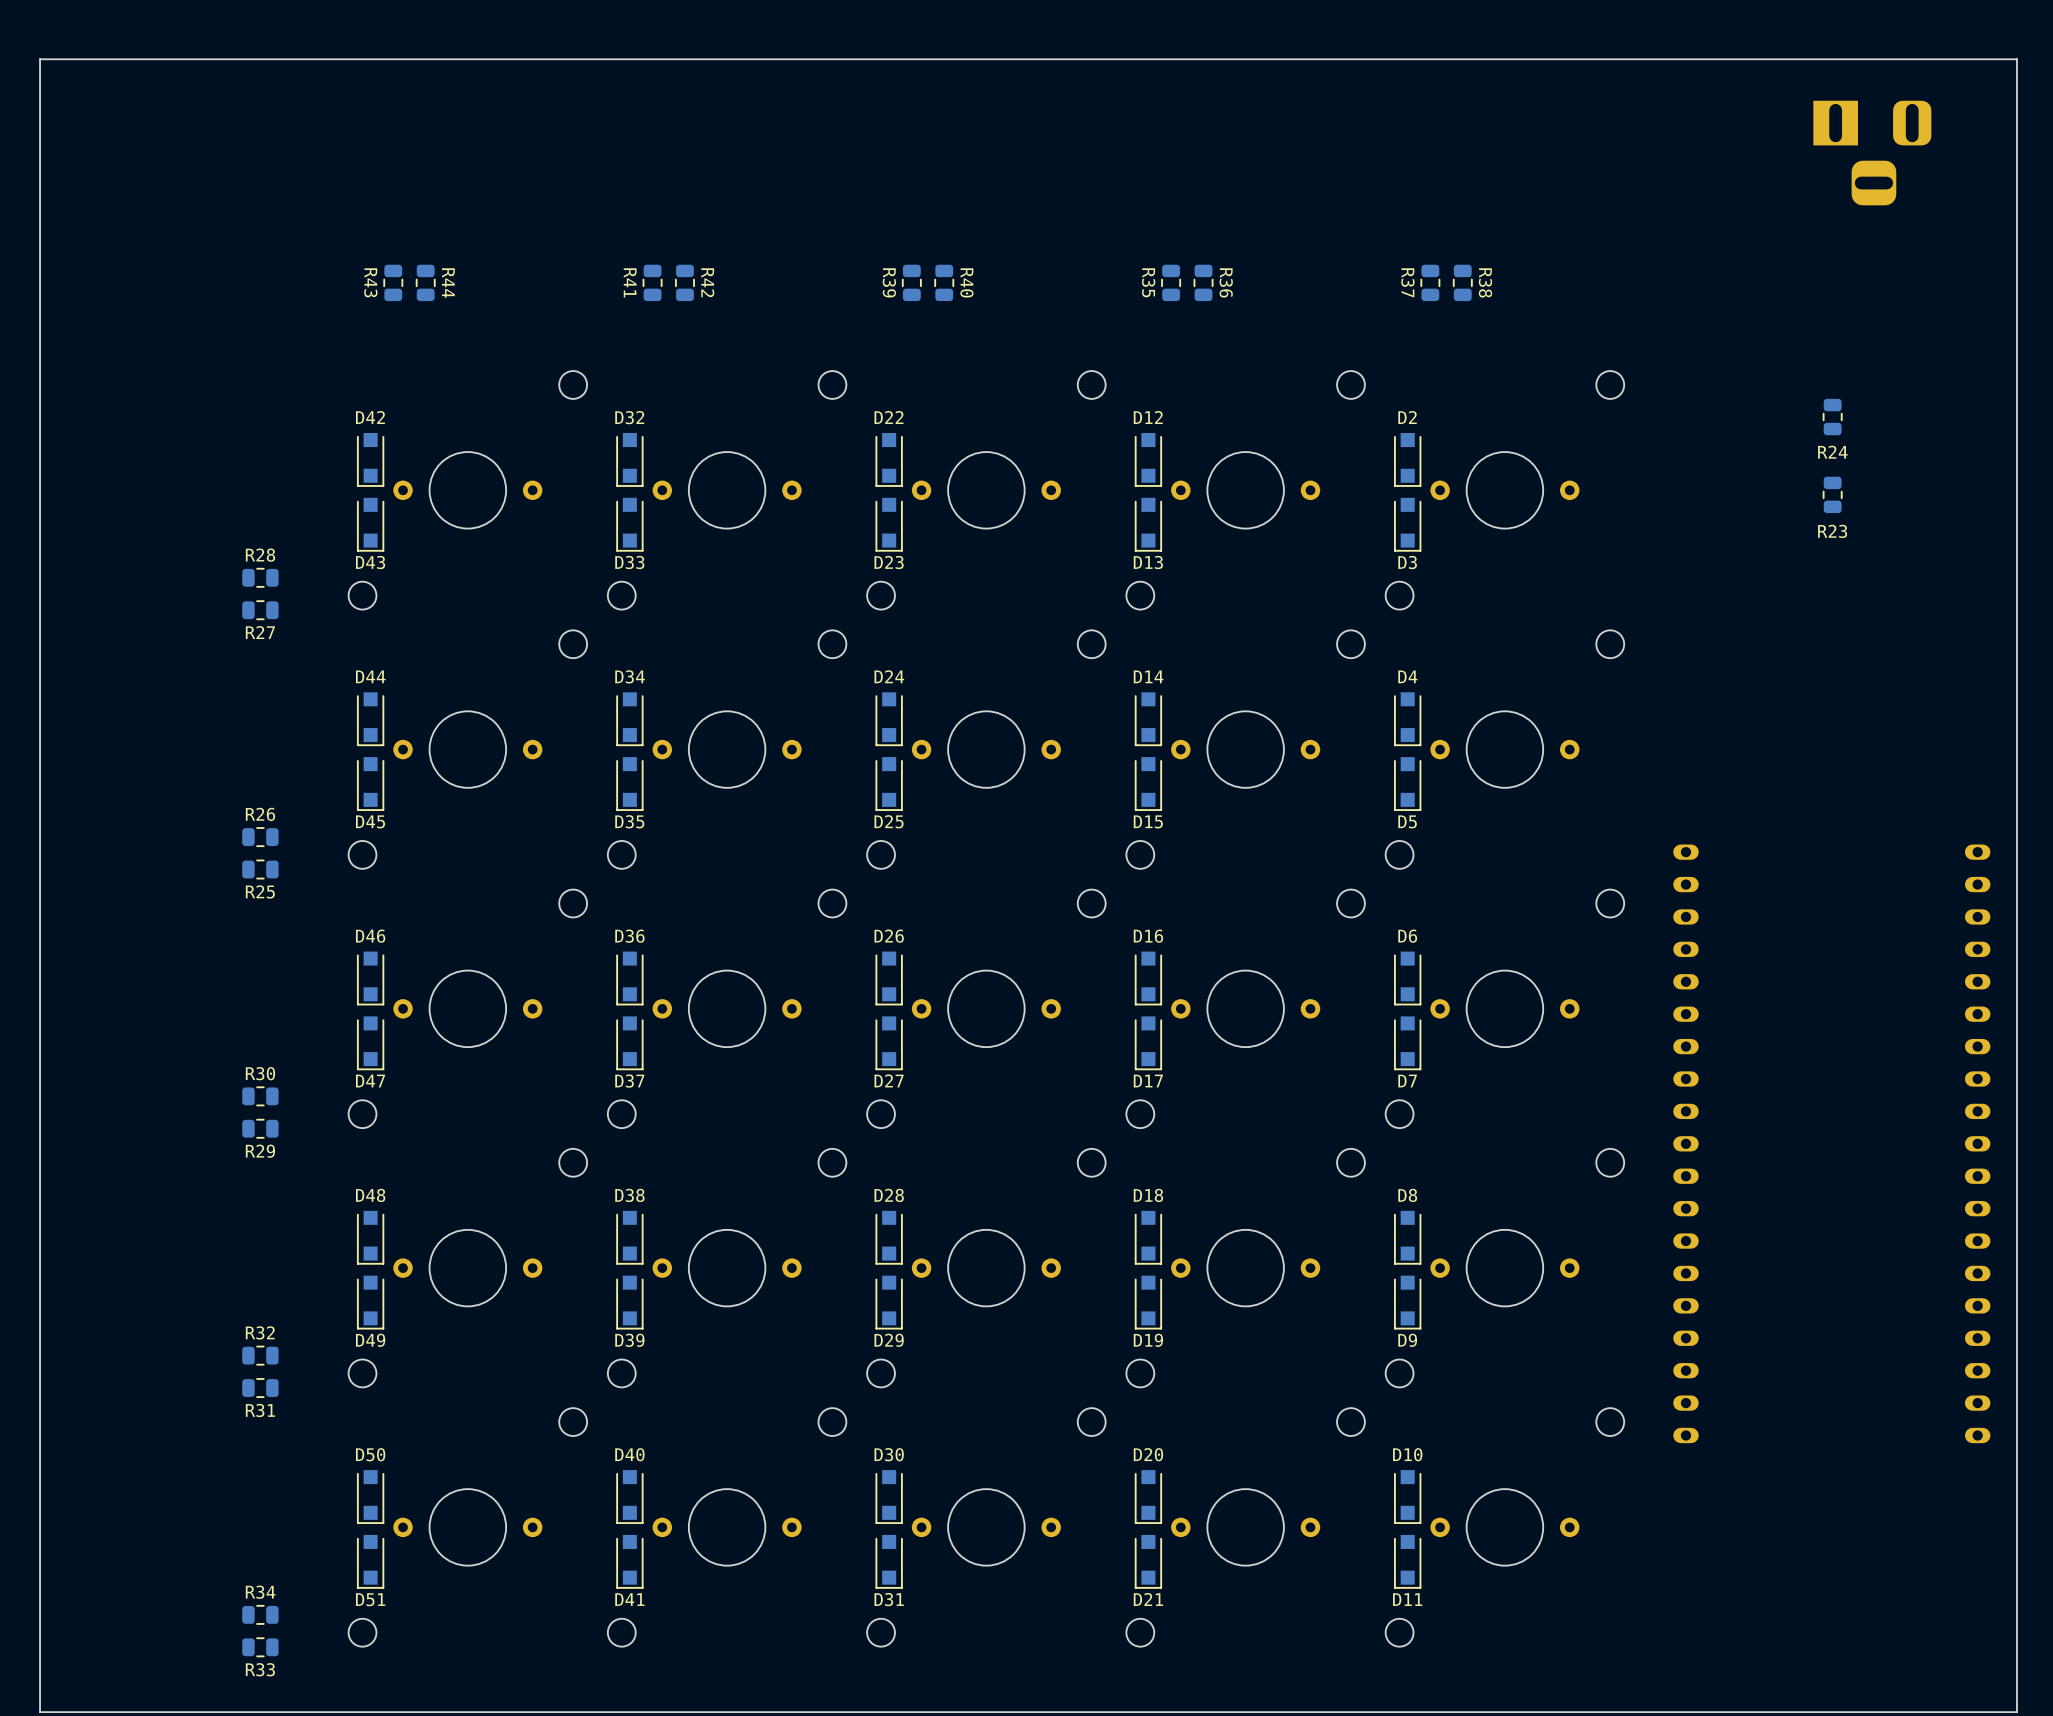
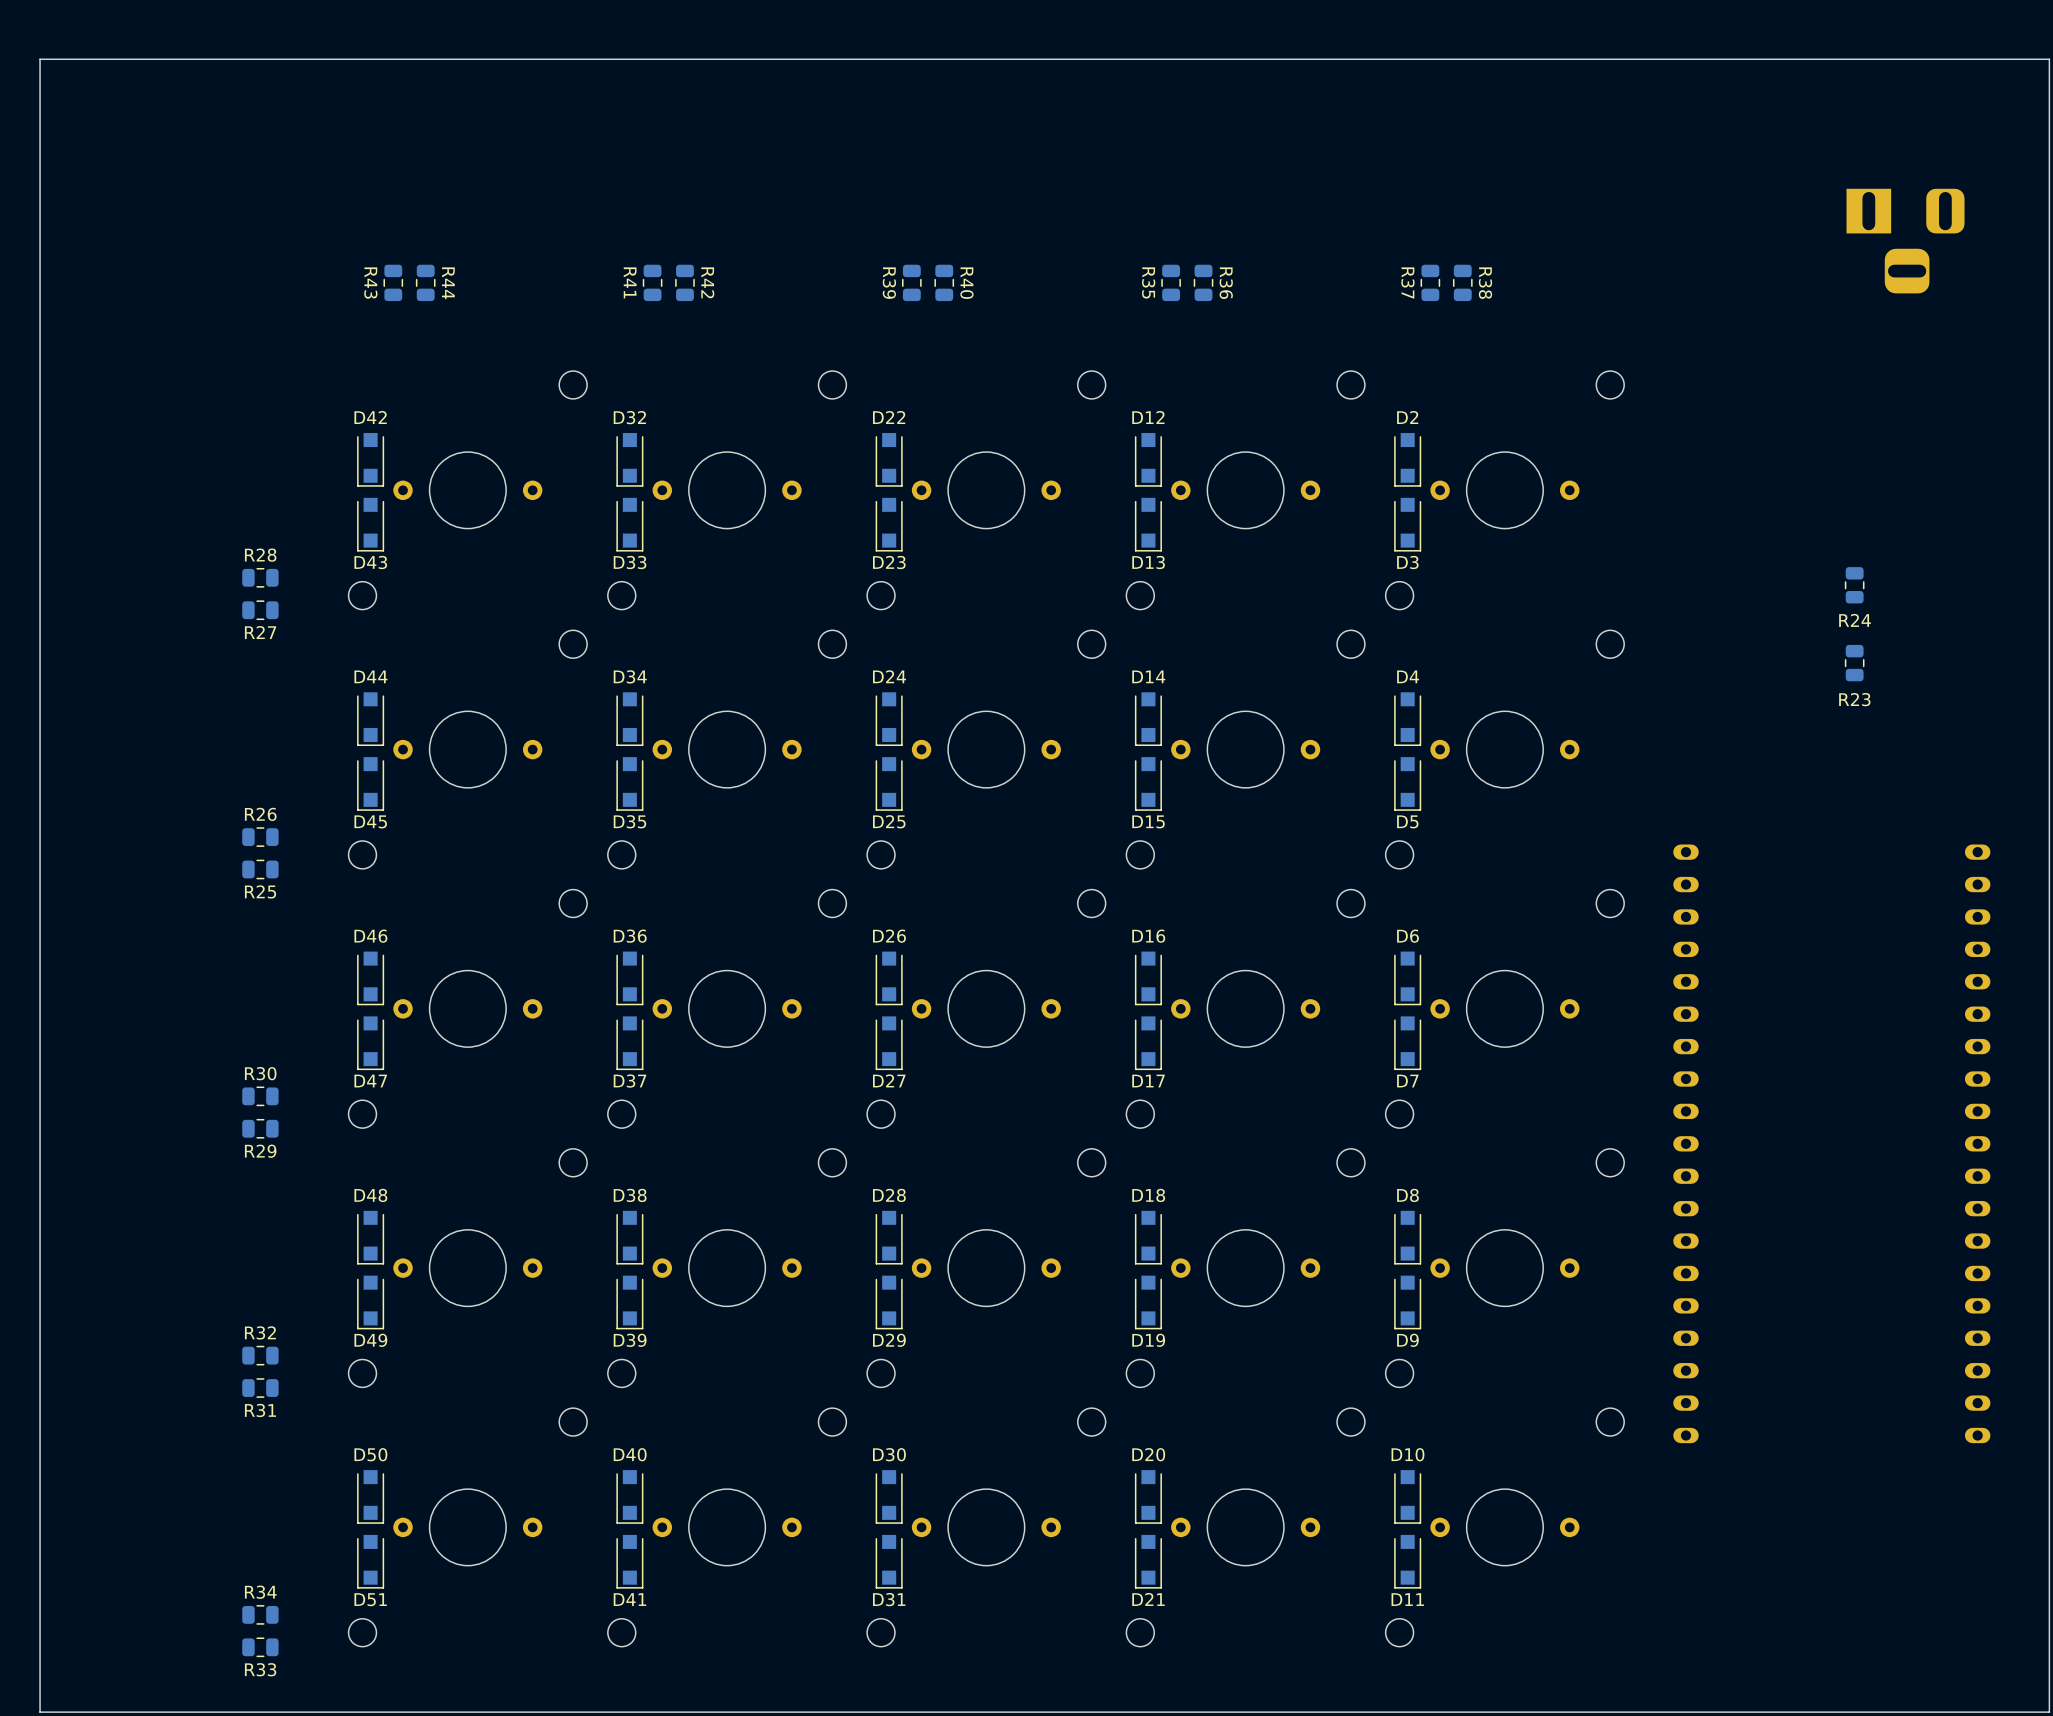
board edge: (2016, 59) (2016, 1712) -> (2016, 59) (2049, 59) (2049, 1712) (2016, 1712)
part position: (1872, 153) -> (1905, 241)
R24 position: (1832, 417) -> (1854, 585)
R23 position: (1832, 494) -> (1854, 663)

